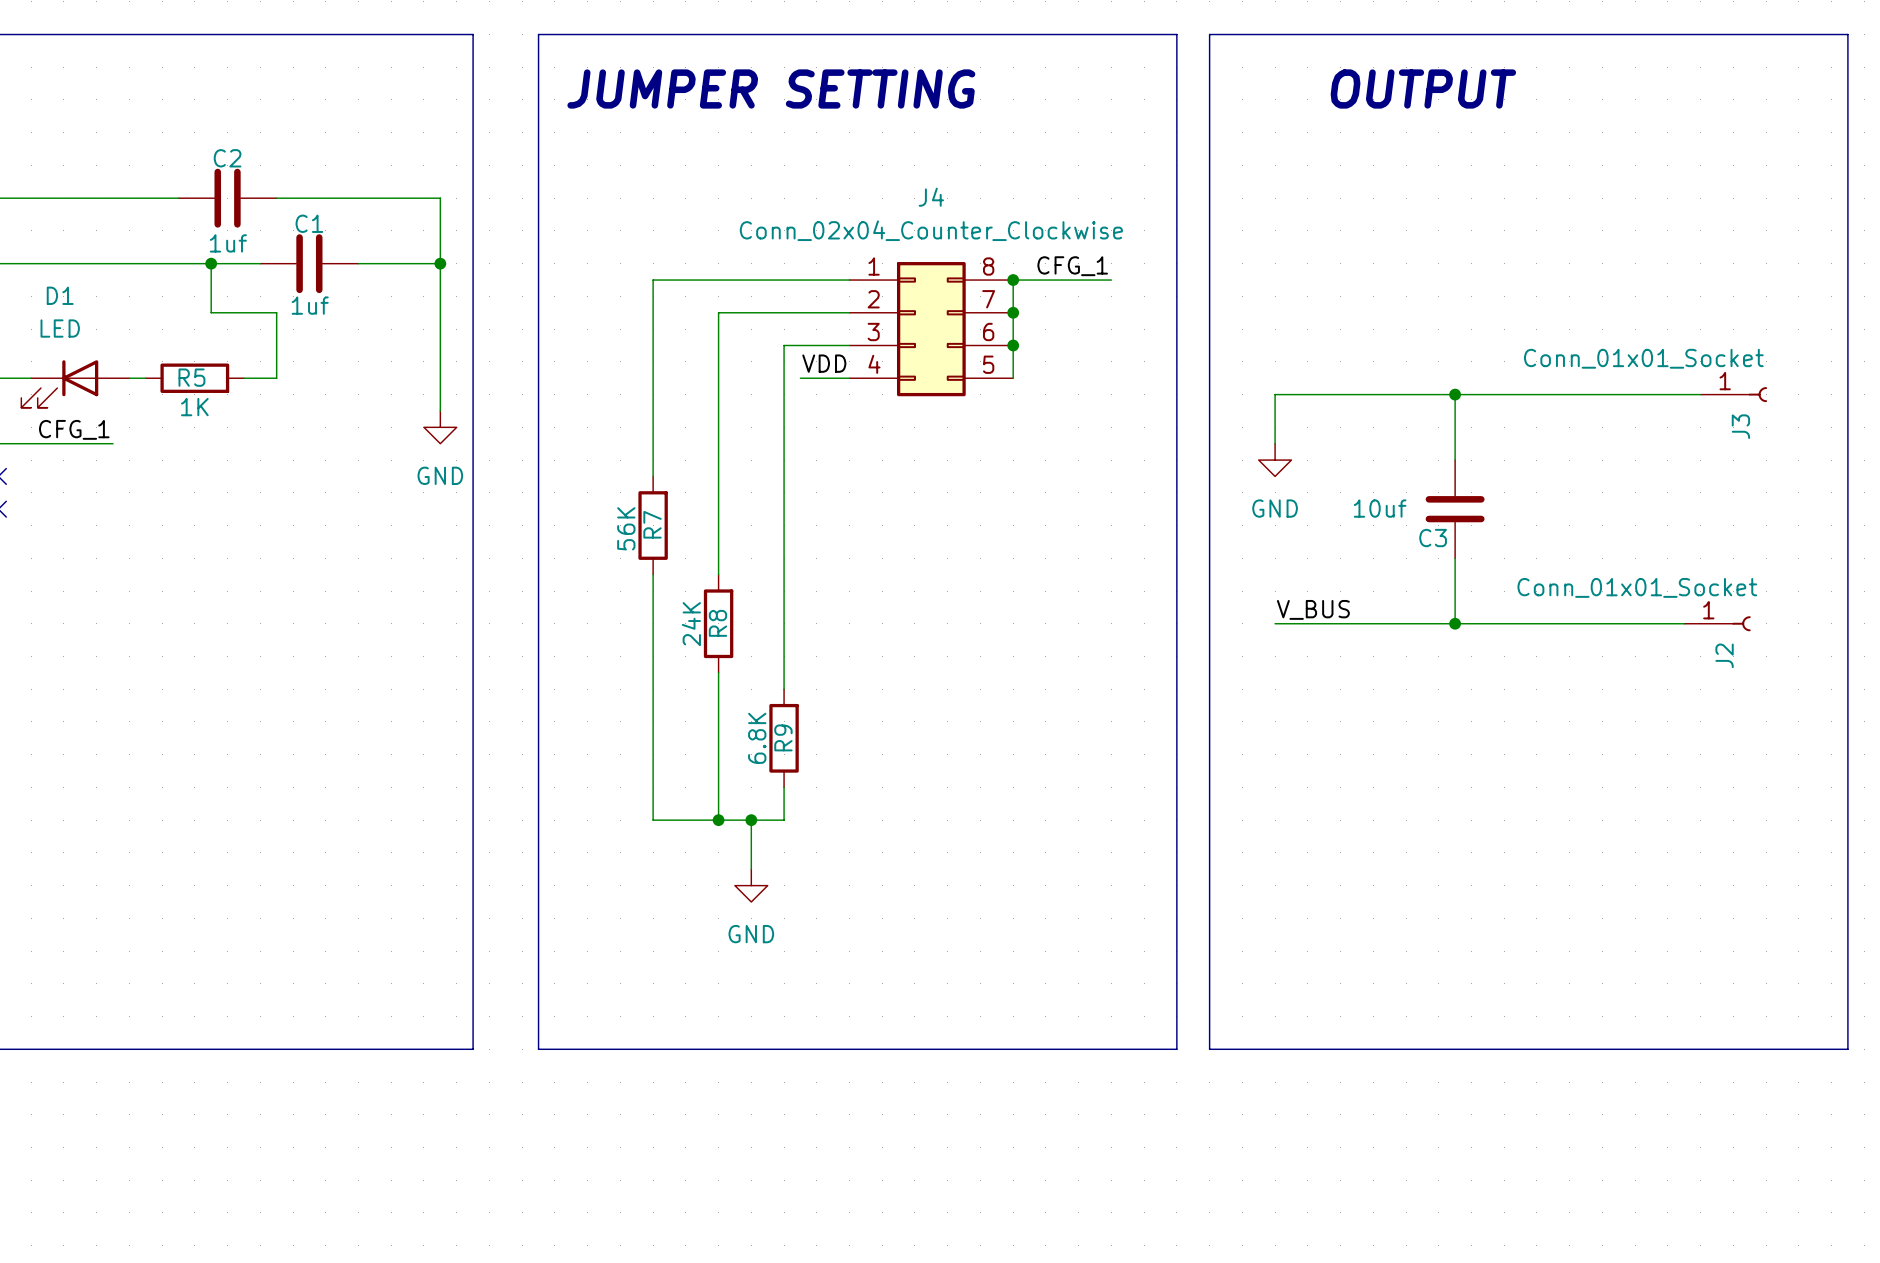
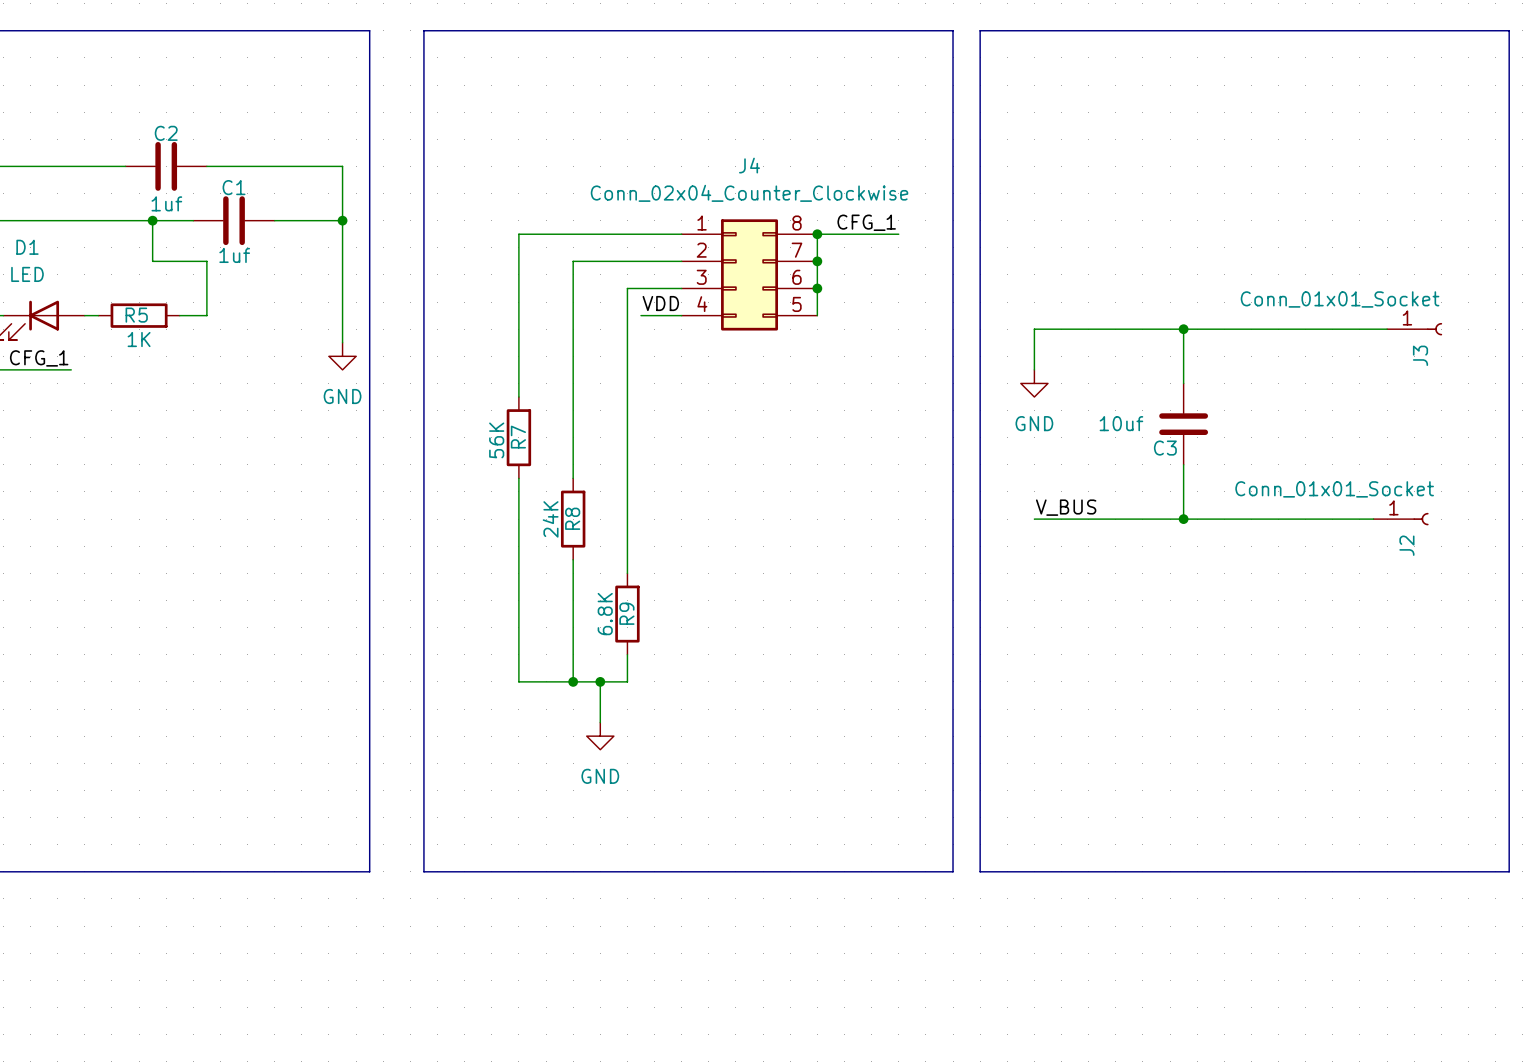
text: JUMPER SETTING (771, 89) -> none
text: OUTPUT (1423, 89) -> none

